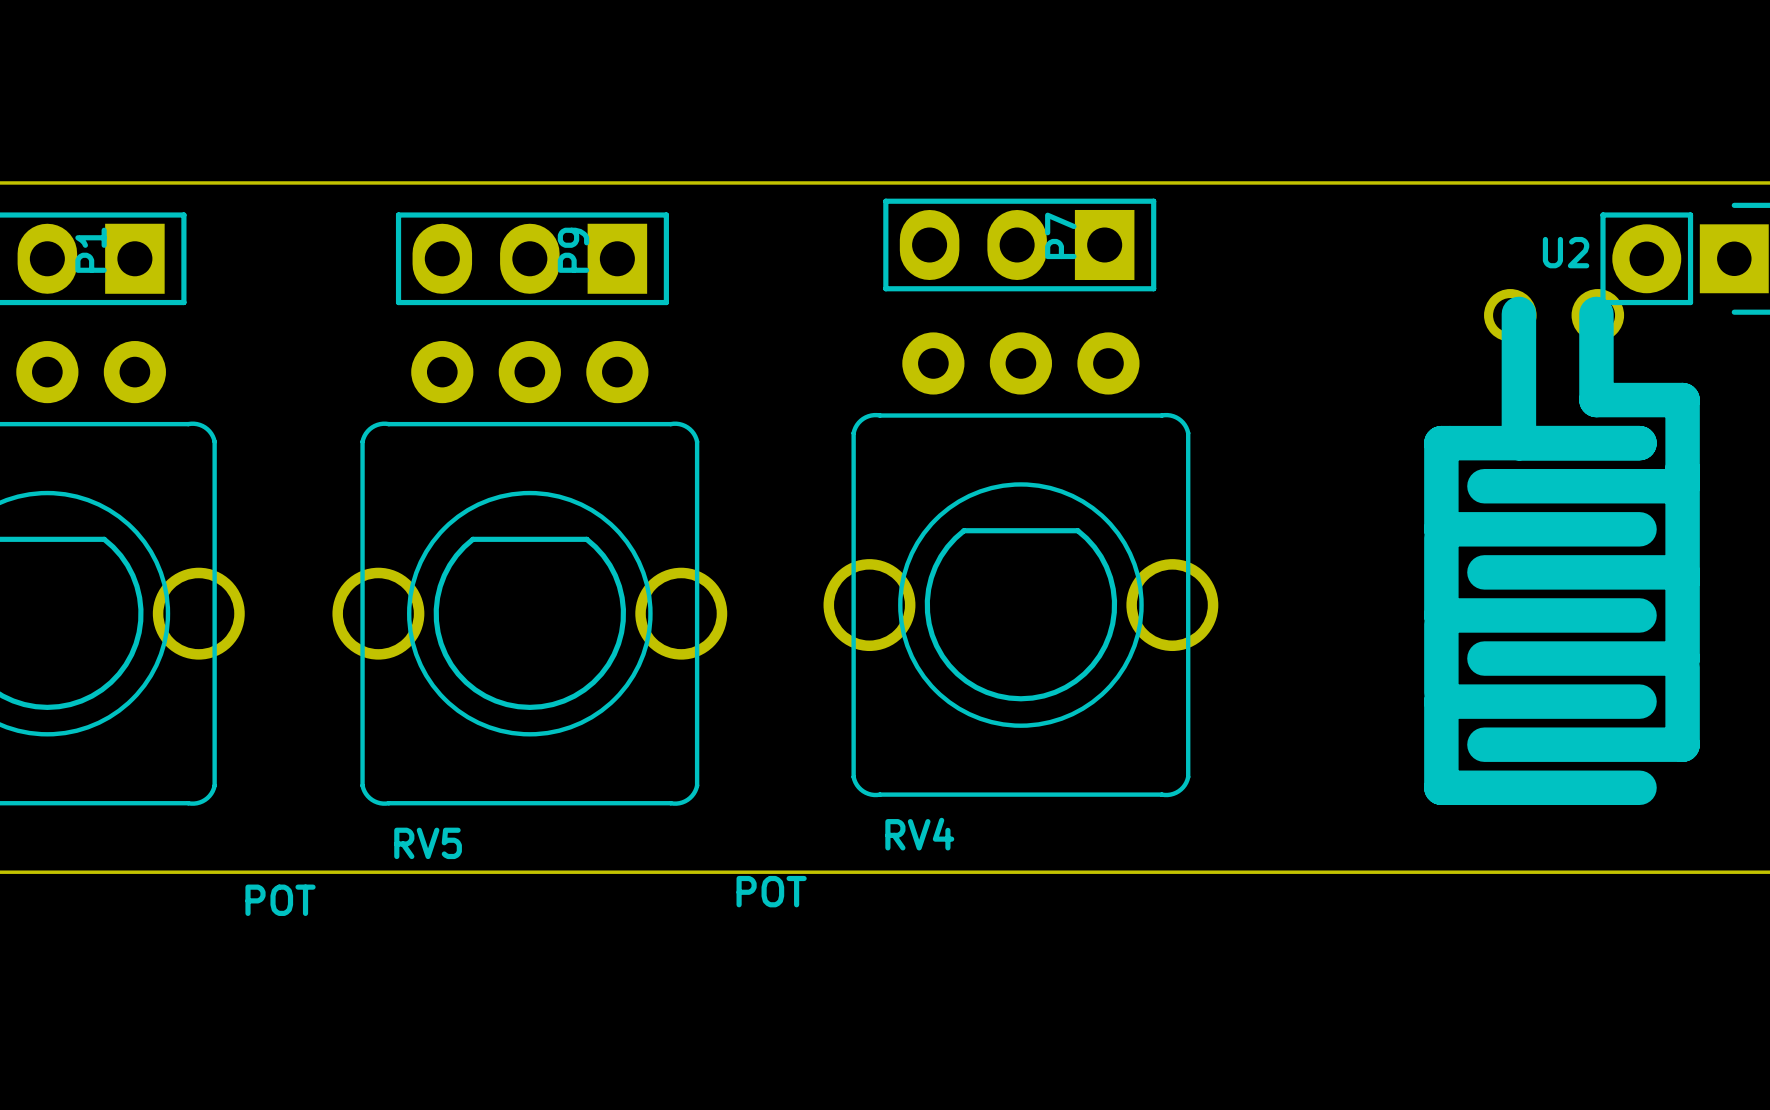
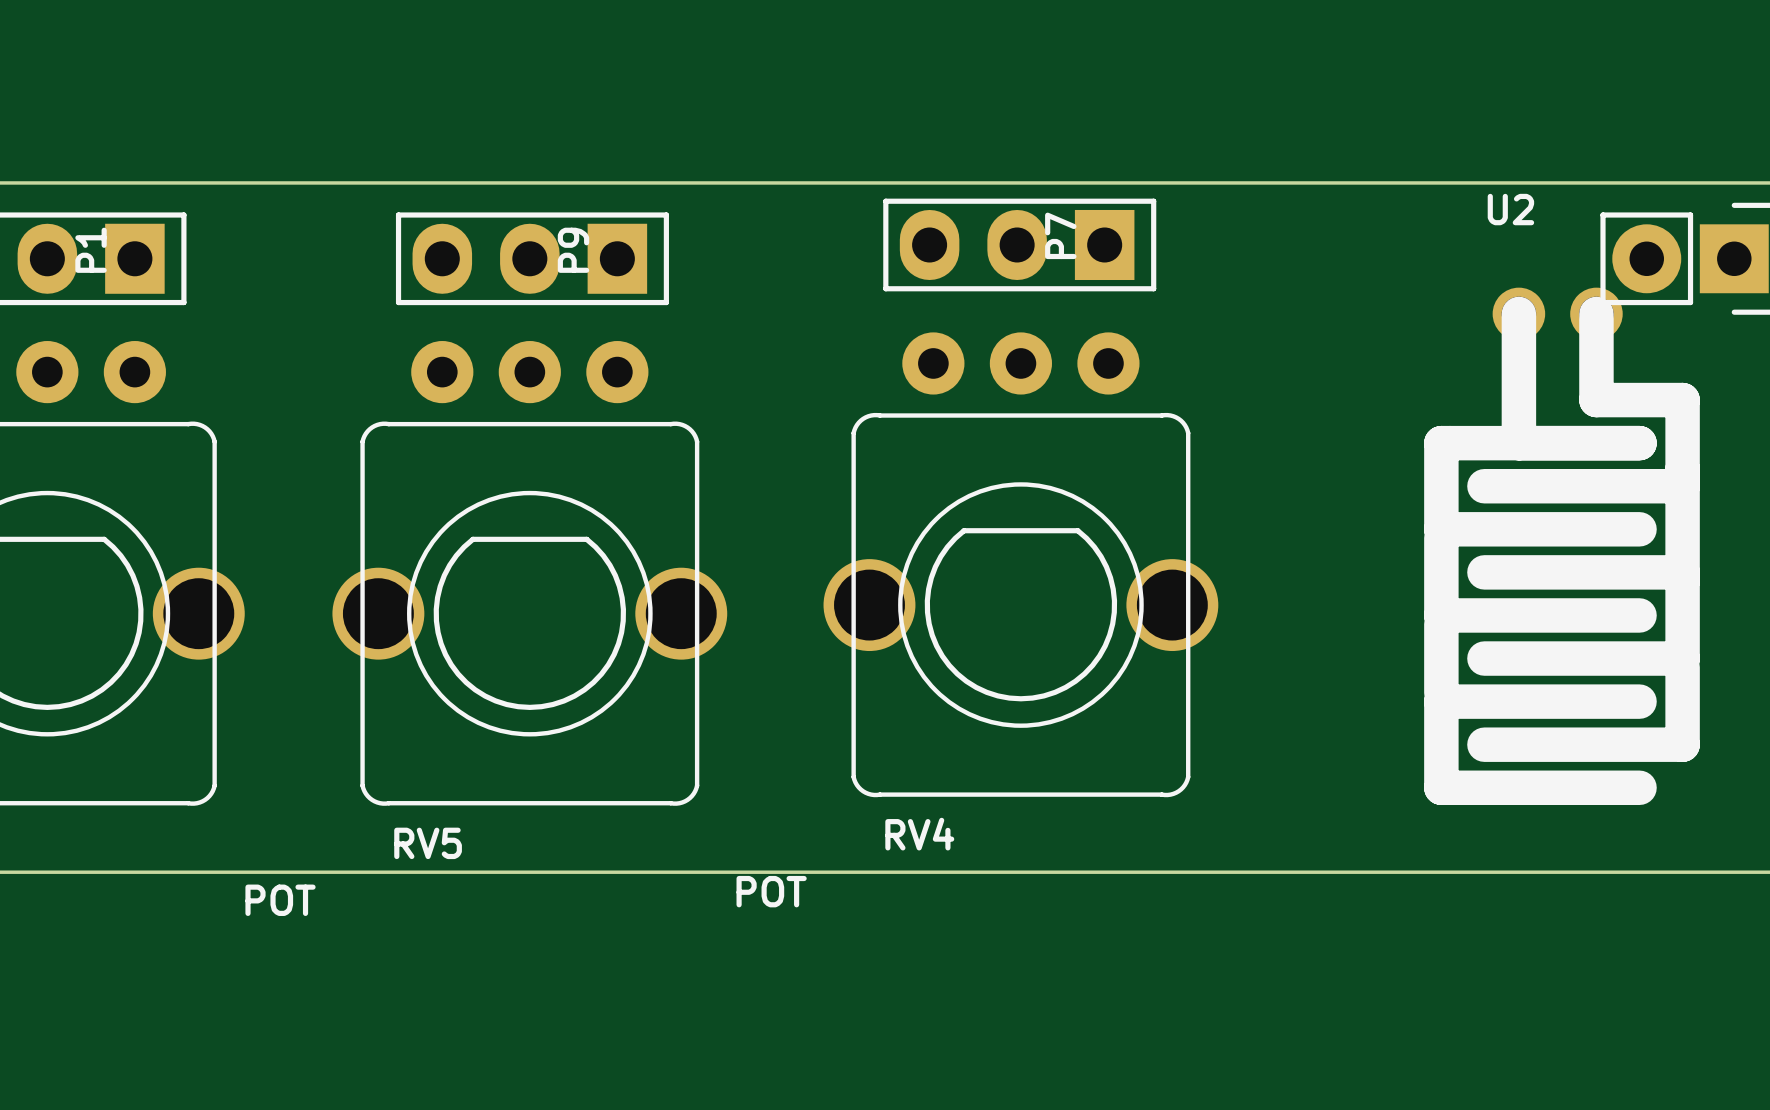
U2 name position: U2 (1566, 252) -> U2 (1510, 209)
U2 footprint: [1424, 289, 1700, 806] -> [1424, 287, 1700, 806]

